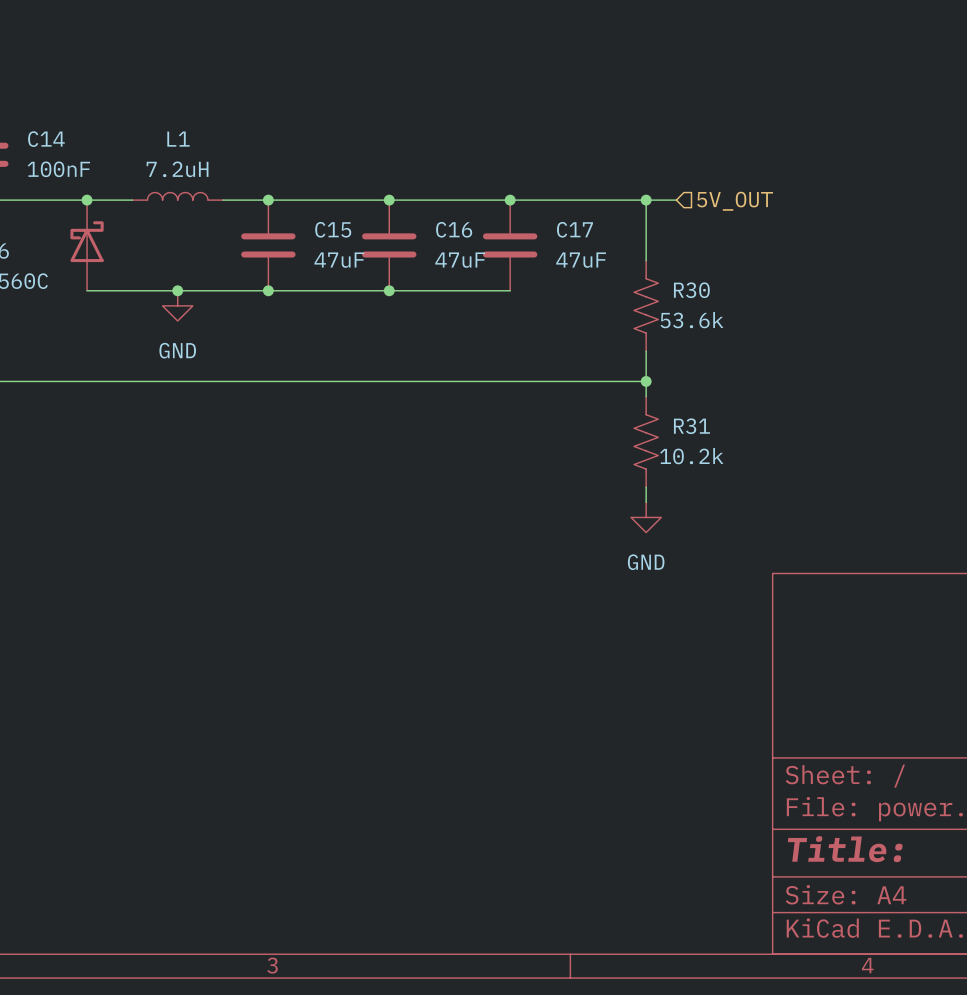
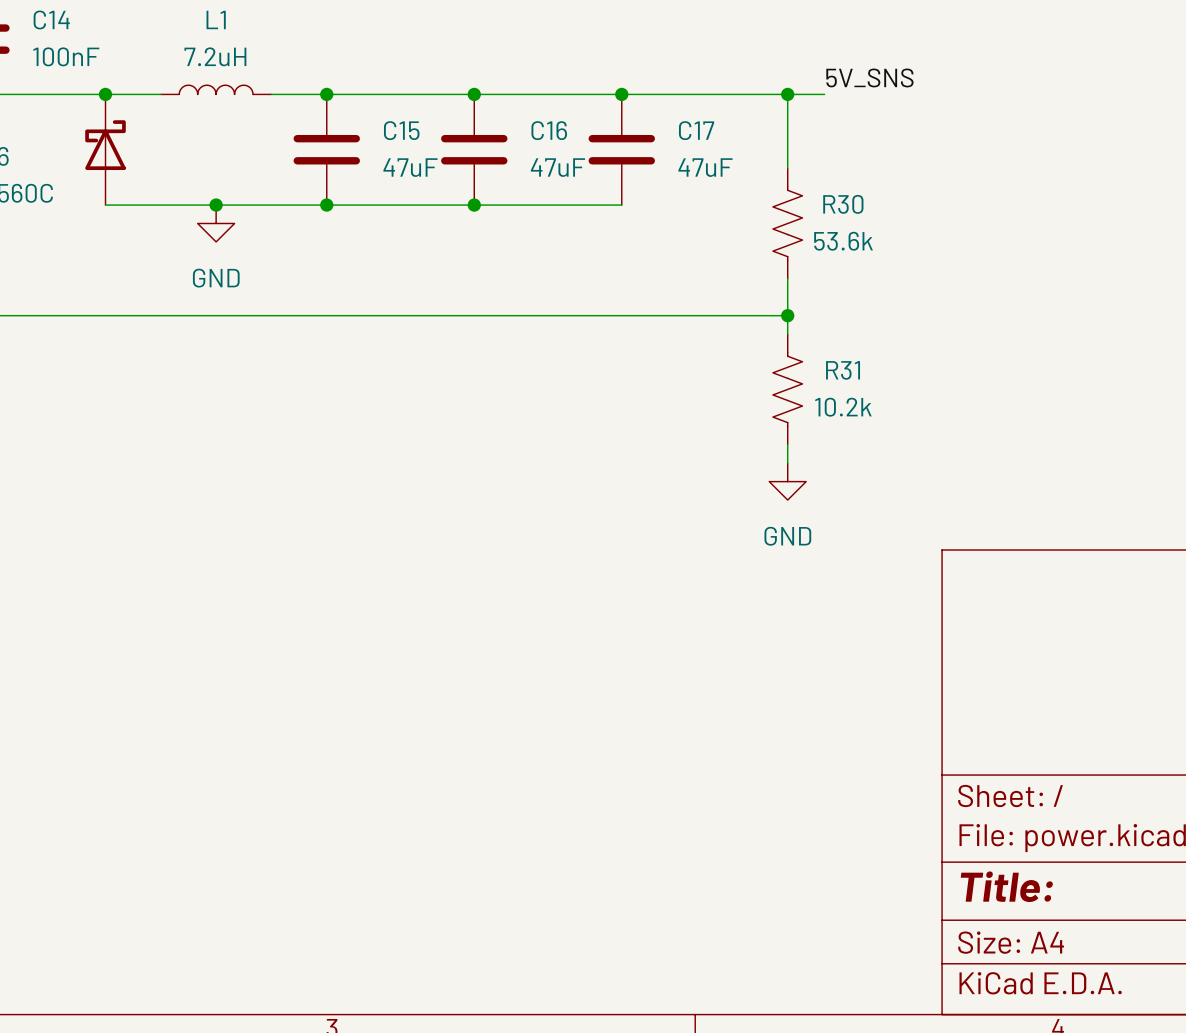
label: none -> 5V_SNS (869, 77)
hierarchical label: 5V_OUT (735, 201) -> none

